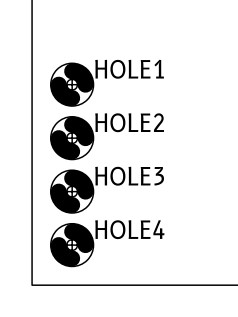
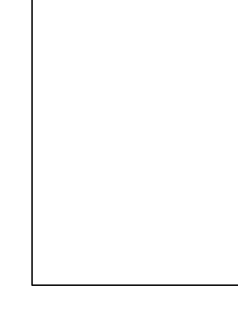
HOLE1: (72, 84) -> none
HOLE2: (72, 138) -> none
HOLE3: (72, 191) -> none
HOLE4: (72, 245) -> none

